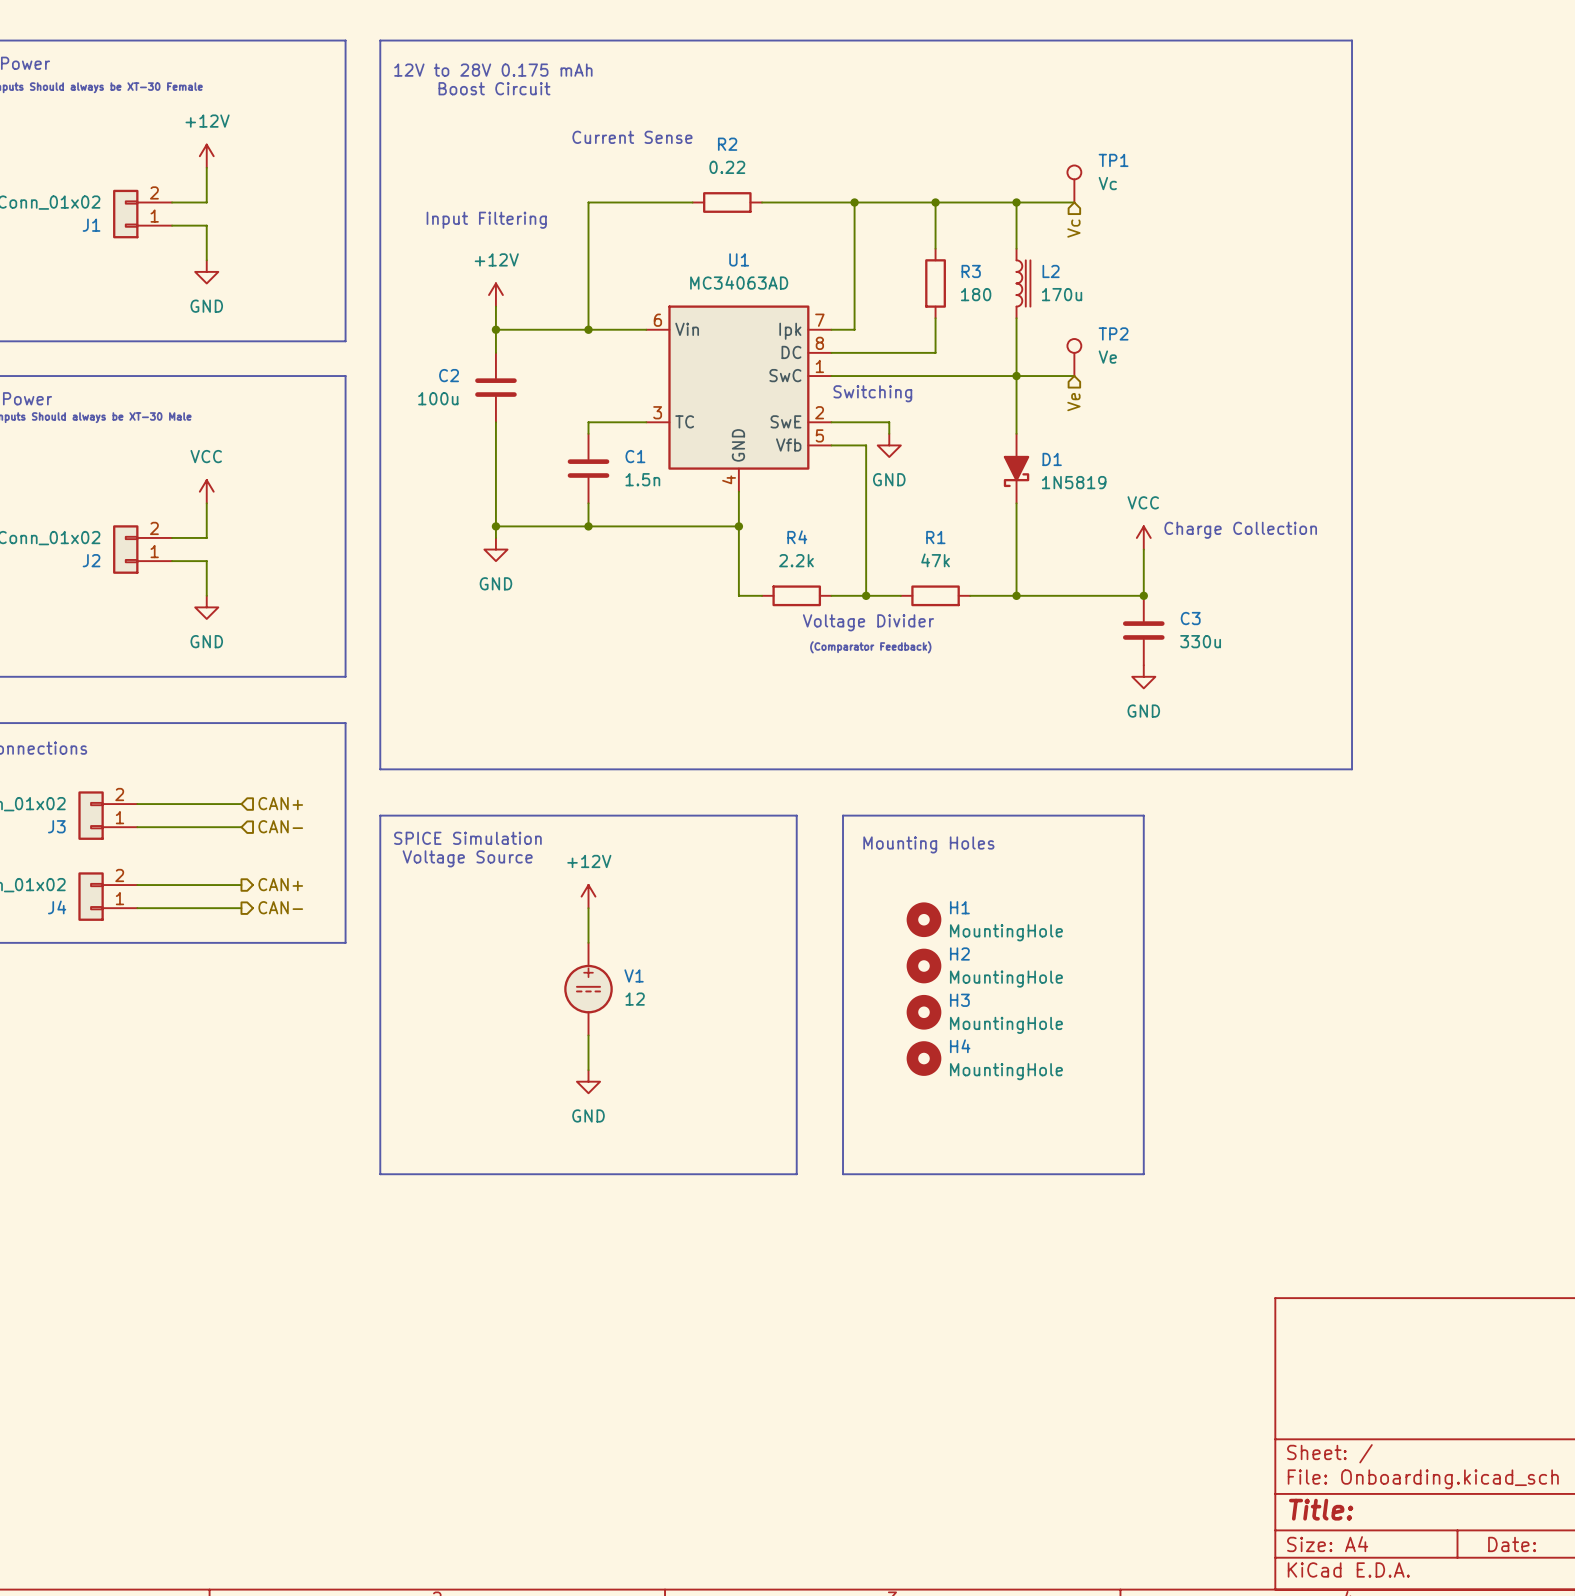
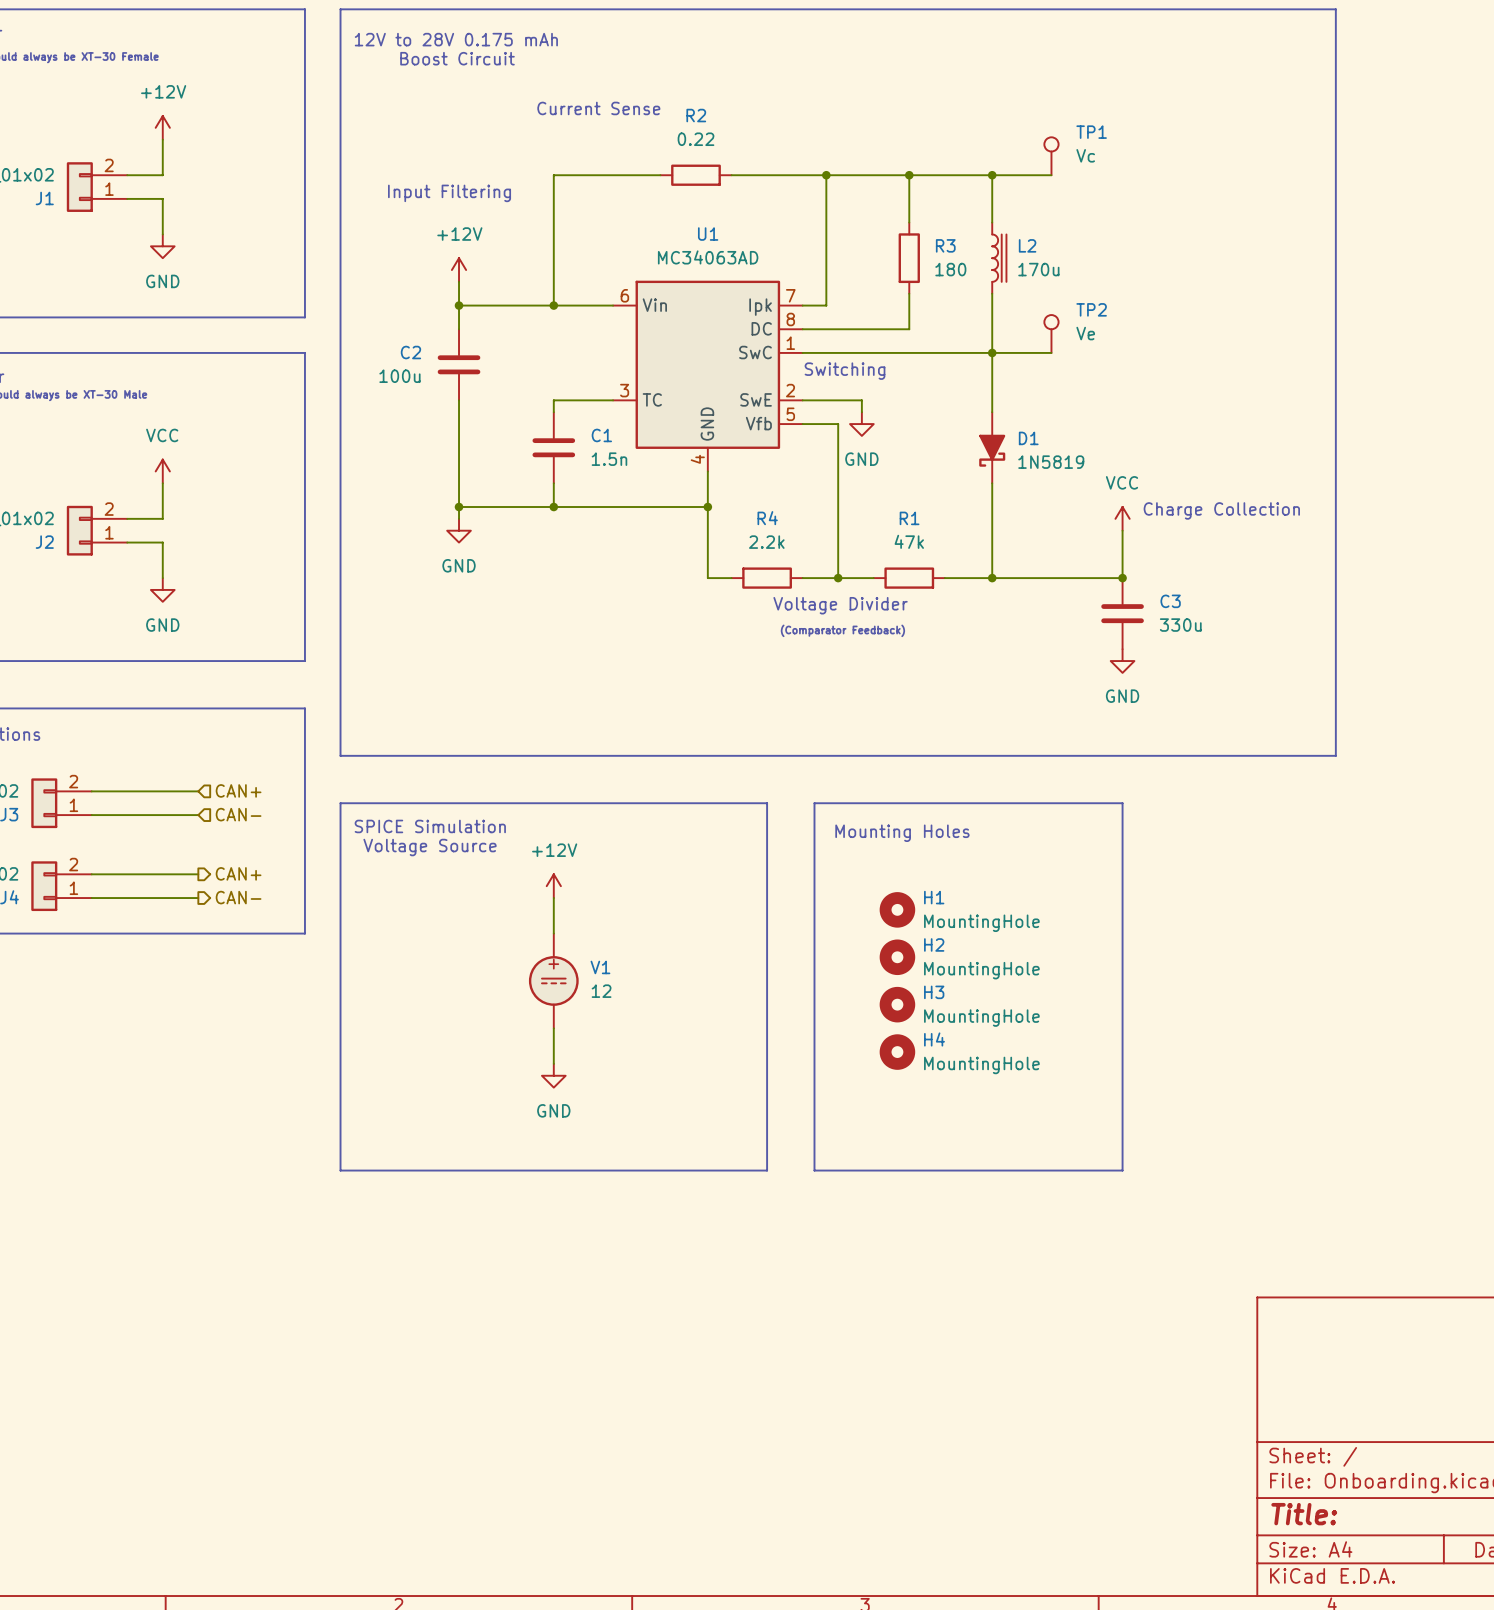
hierarchical label: Vc (1073, 228) -> none
hierarchical label: Ve (1073, 402) -> none

